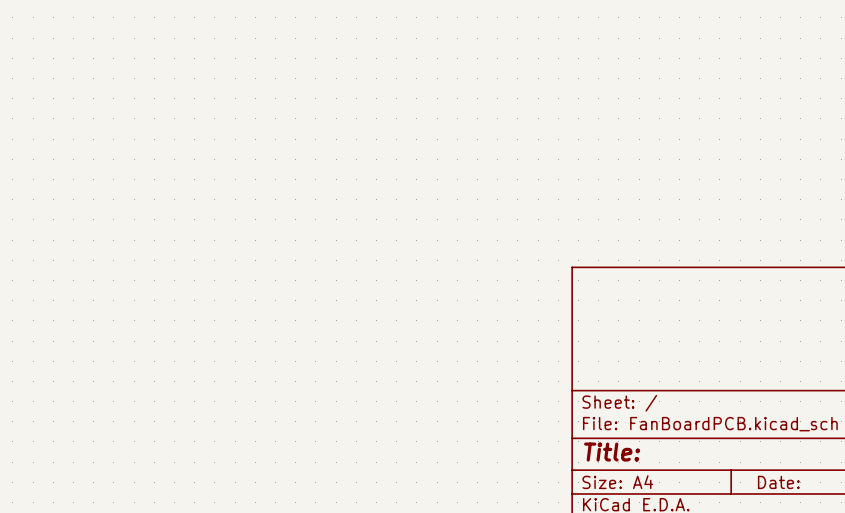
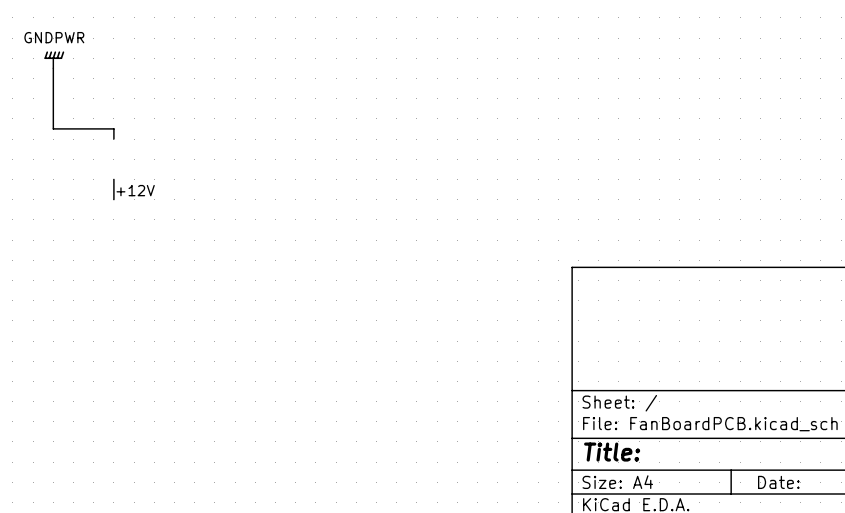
power symbol: none -> GNDPWR (54, 59)
wire: none -> (53, 68) (53, 128) (113, 128) (113, 139)
wire: none -> (113, 179) (113, 199)
label: none -> +12V (135, 190)

